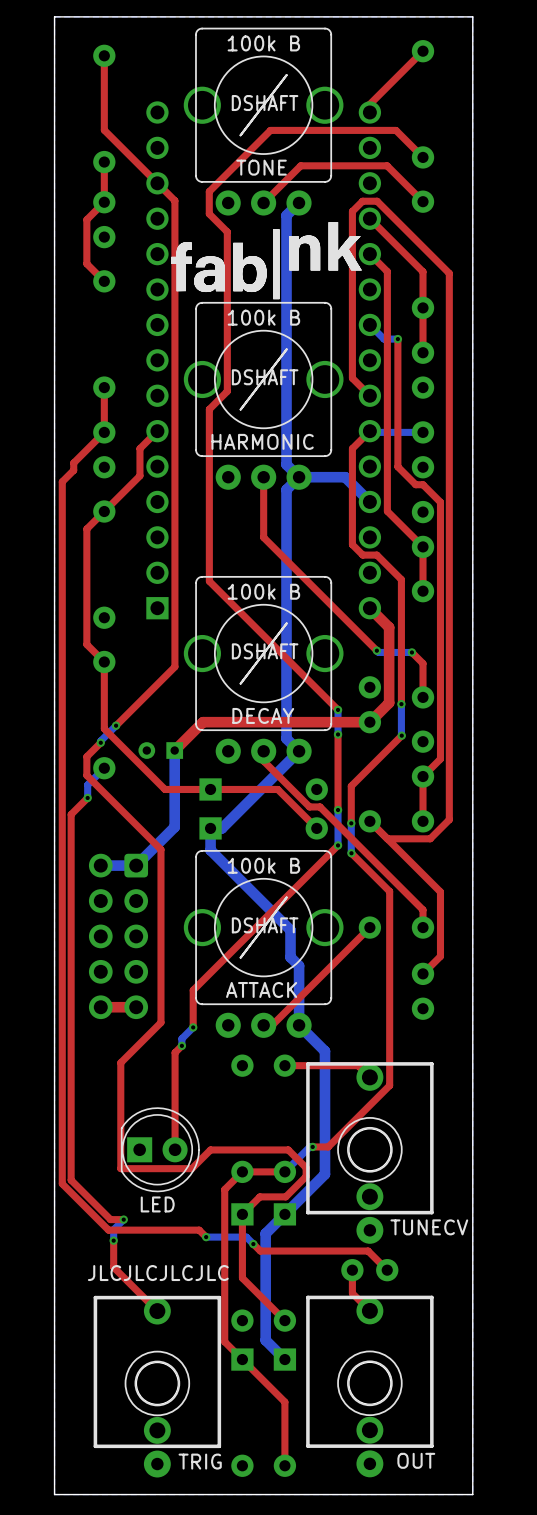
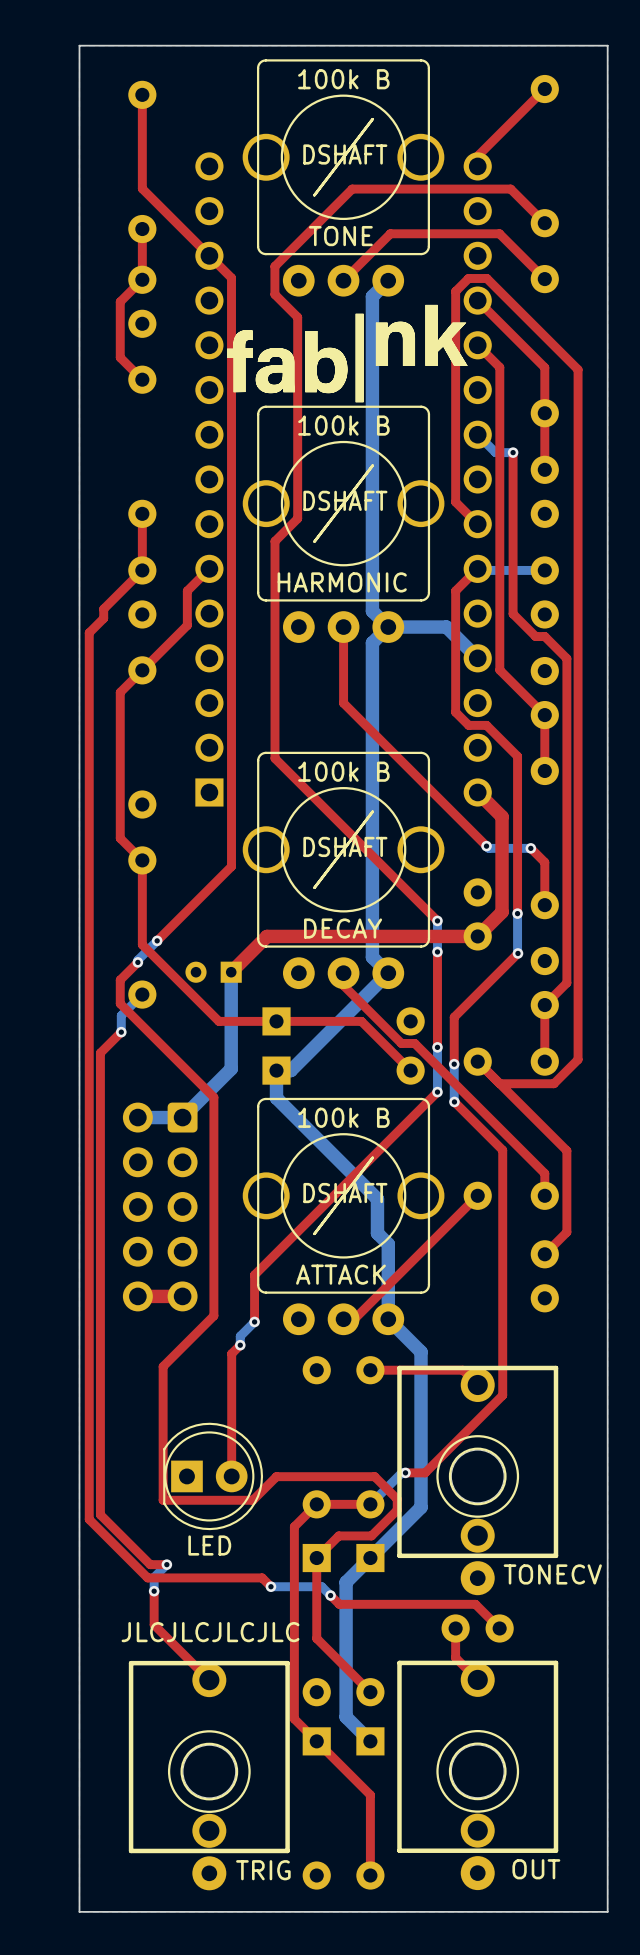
part value: TUNECV (429, 1227) -> TONECV (552, 1574)

